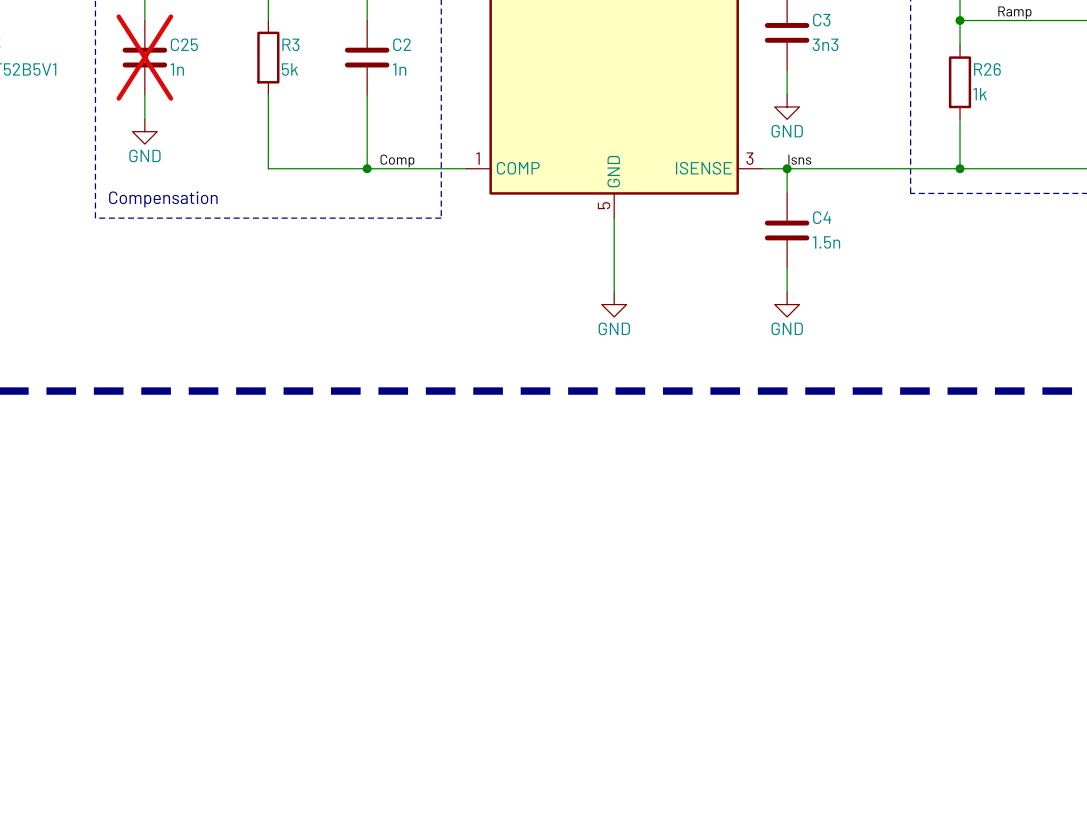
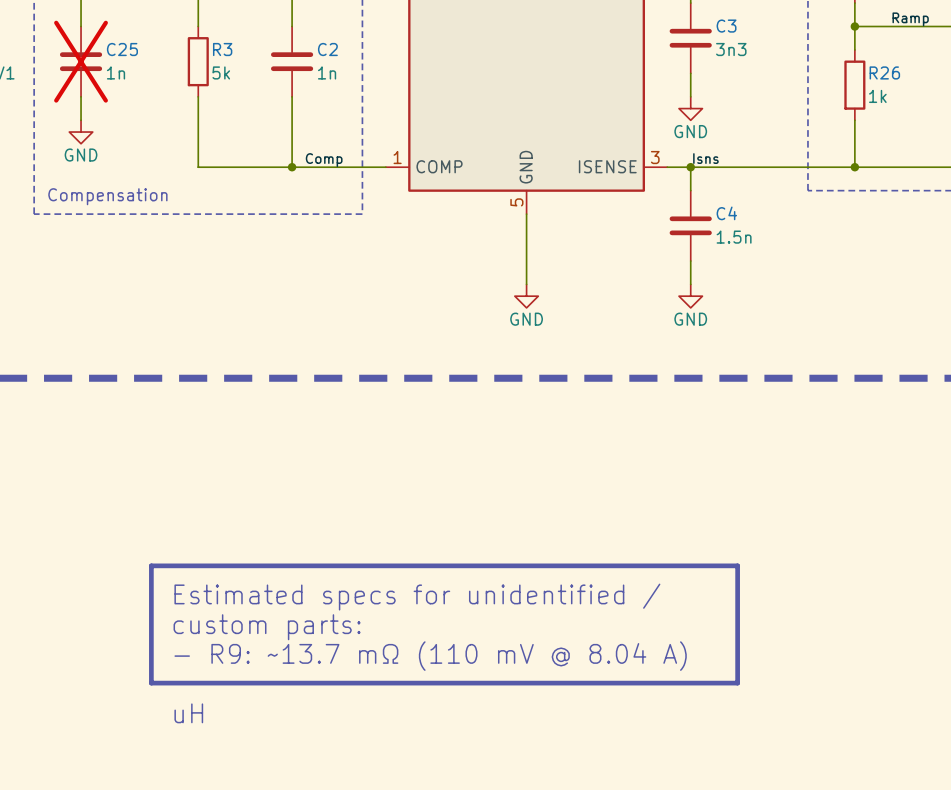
line: none -> (151, 565) (737, 565) (737, 683) (151, 683) (151, 565)
text: none -> Estimated specs for unidentified / (417, 597)
text: none -> custom parts: (267, 627)
text: none -> - R9: ~13.7 mΩ (110 mV @ 8.04 A) (430, 656)
text: none -> uH (188, 713)

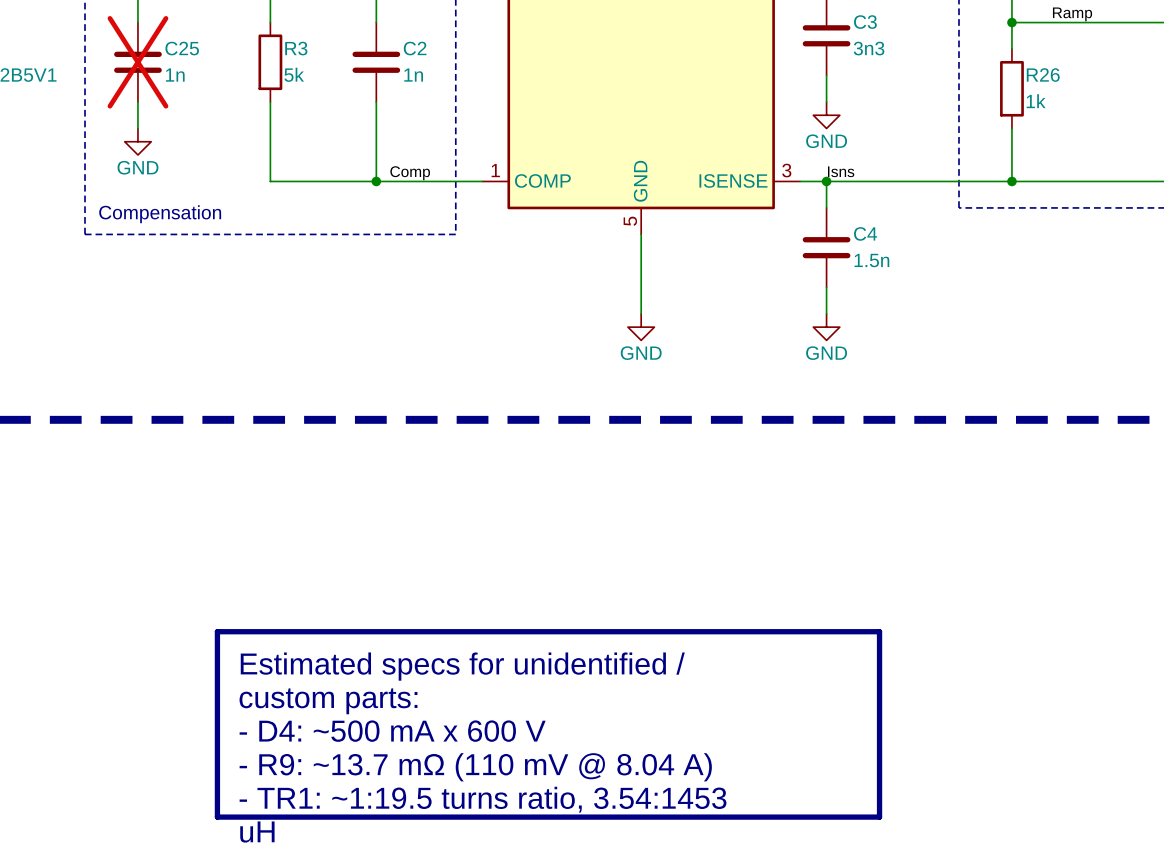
text: - R9: ~13.7 mΩ (110 mV @ 8.04 A) (430, 656) -> - D4: ~500 mA x 600 V (392, 731)
line: (151, 683) (737, 683) -> (217, 764) (217, 817) (879, 817) (879, 764)
text: none -> - R9: ~13.7 mΩ (110 mV @ 8.04 A) (475, 767)
text: uH (188, 713) -> - TR1: ~1:19.5 turns ratio, 3.54:1453 (483, 799)
text: none -> uH (257, 832)

